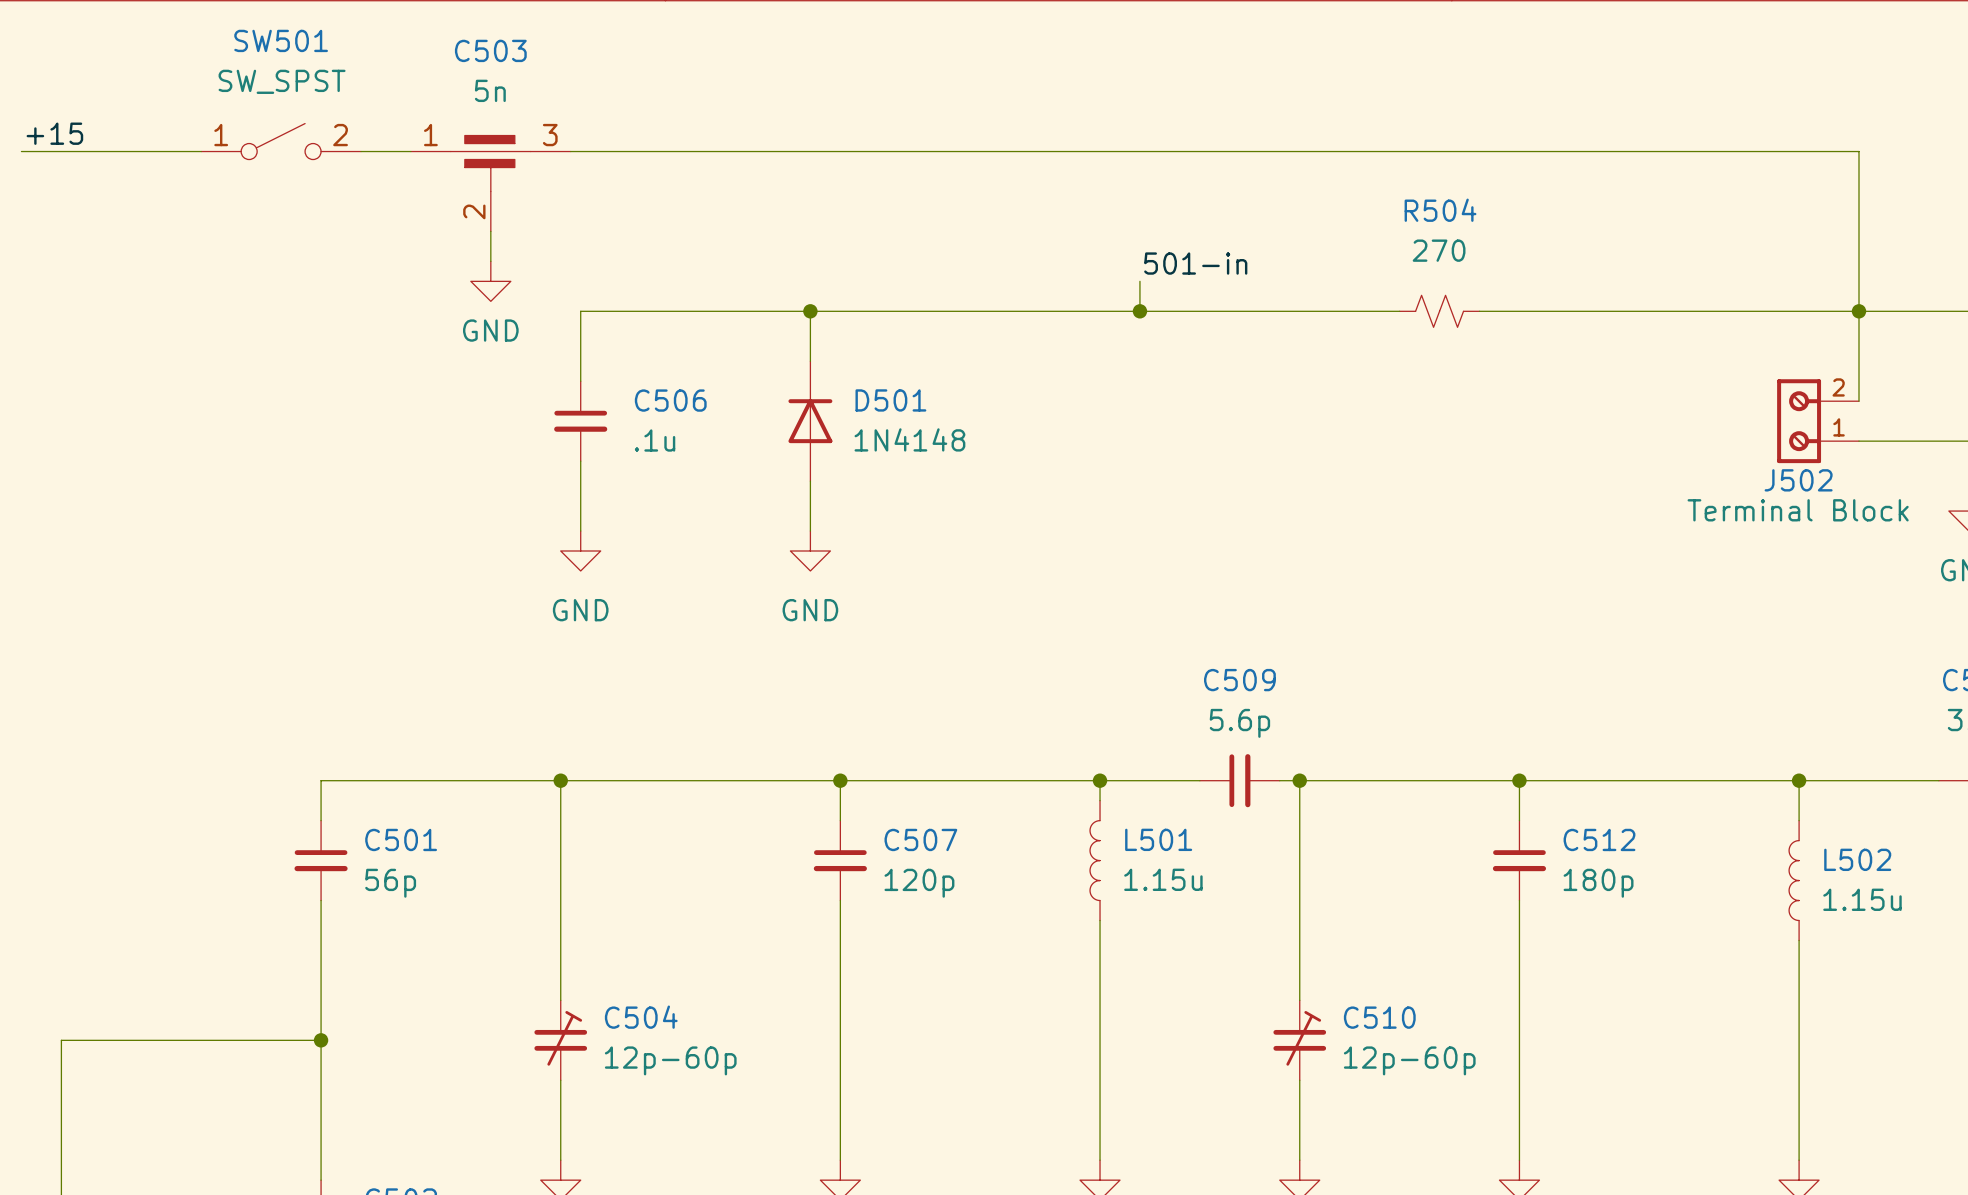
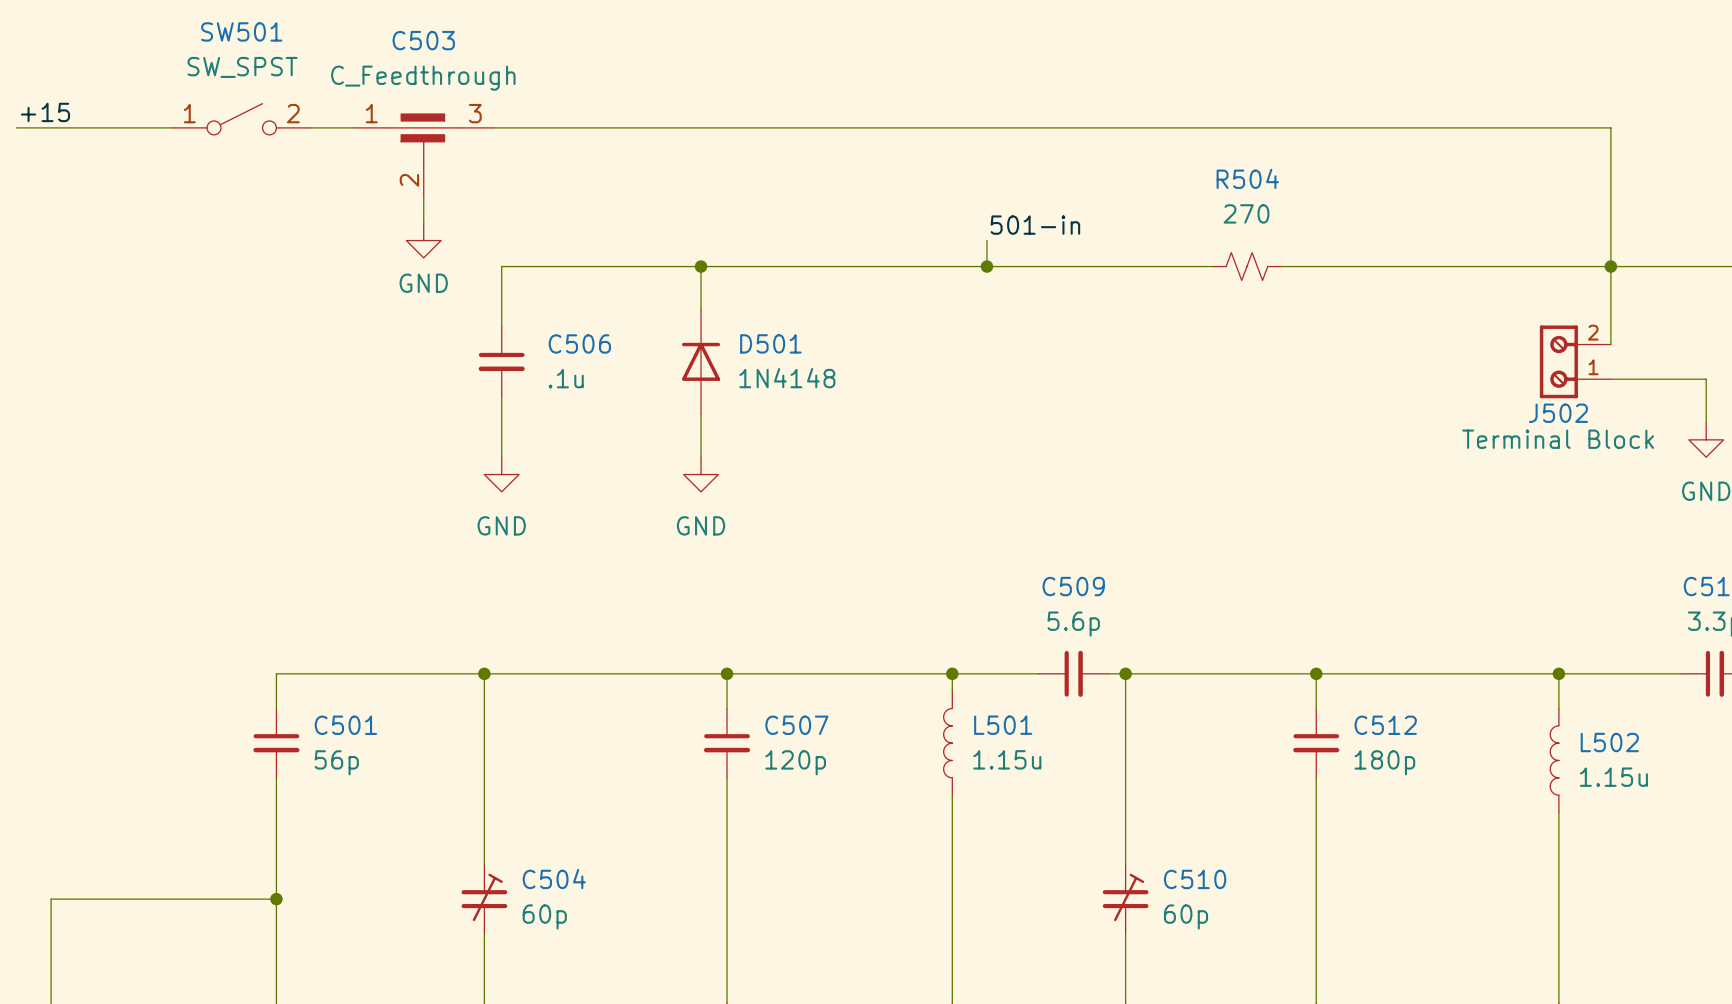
C503 value: 5n (490, 90) -> C_Feedthrough (423, 78)
C504 value: 12p-60p (670, 1060) -> 60p (544, 916)
C510 value: 12p-60p (1409, 1060) -> 60p (1186, 916)

